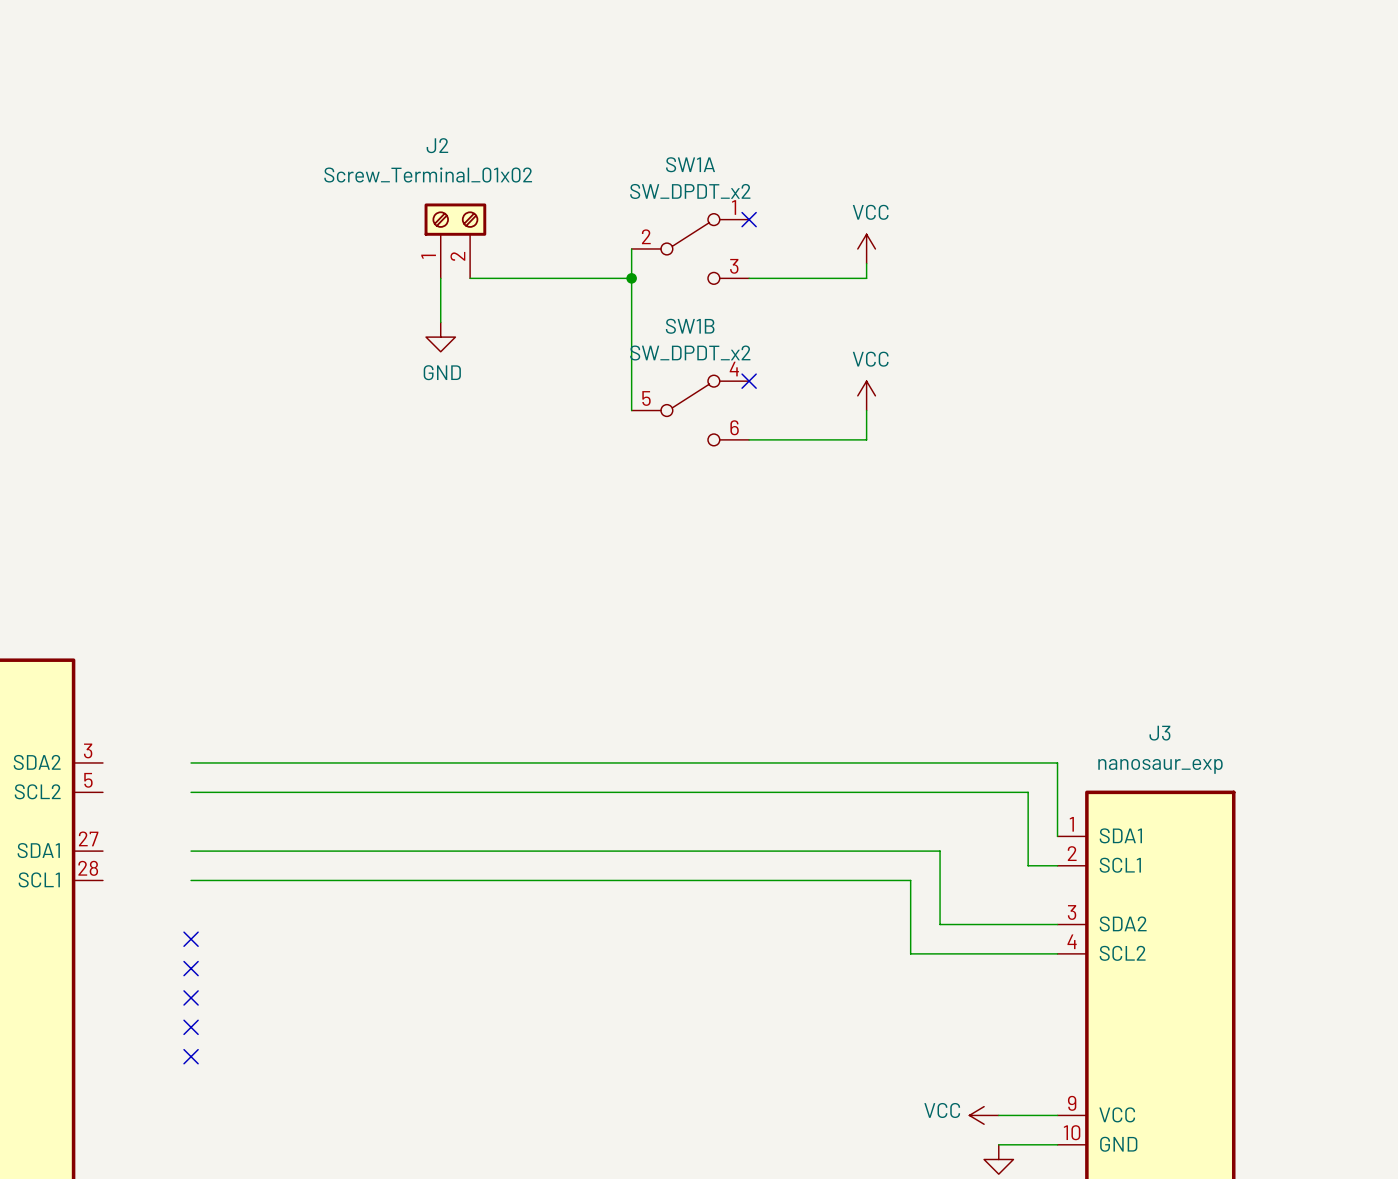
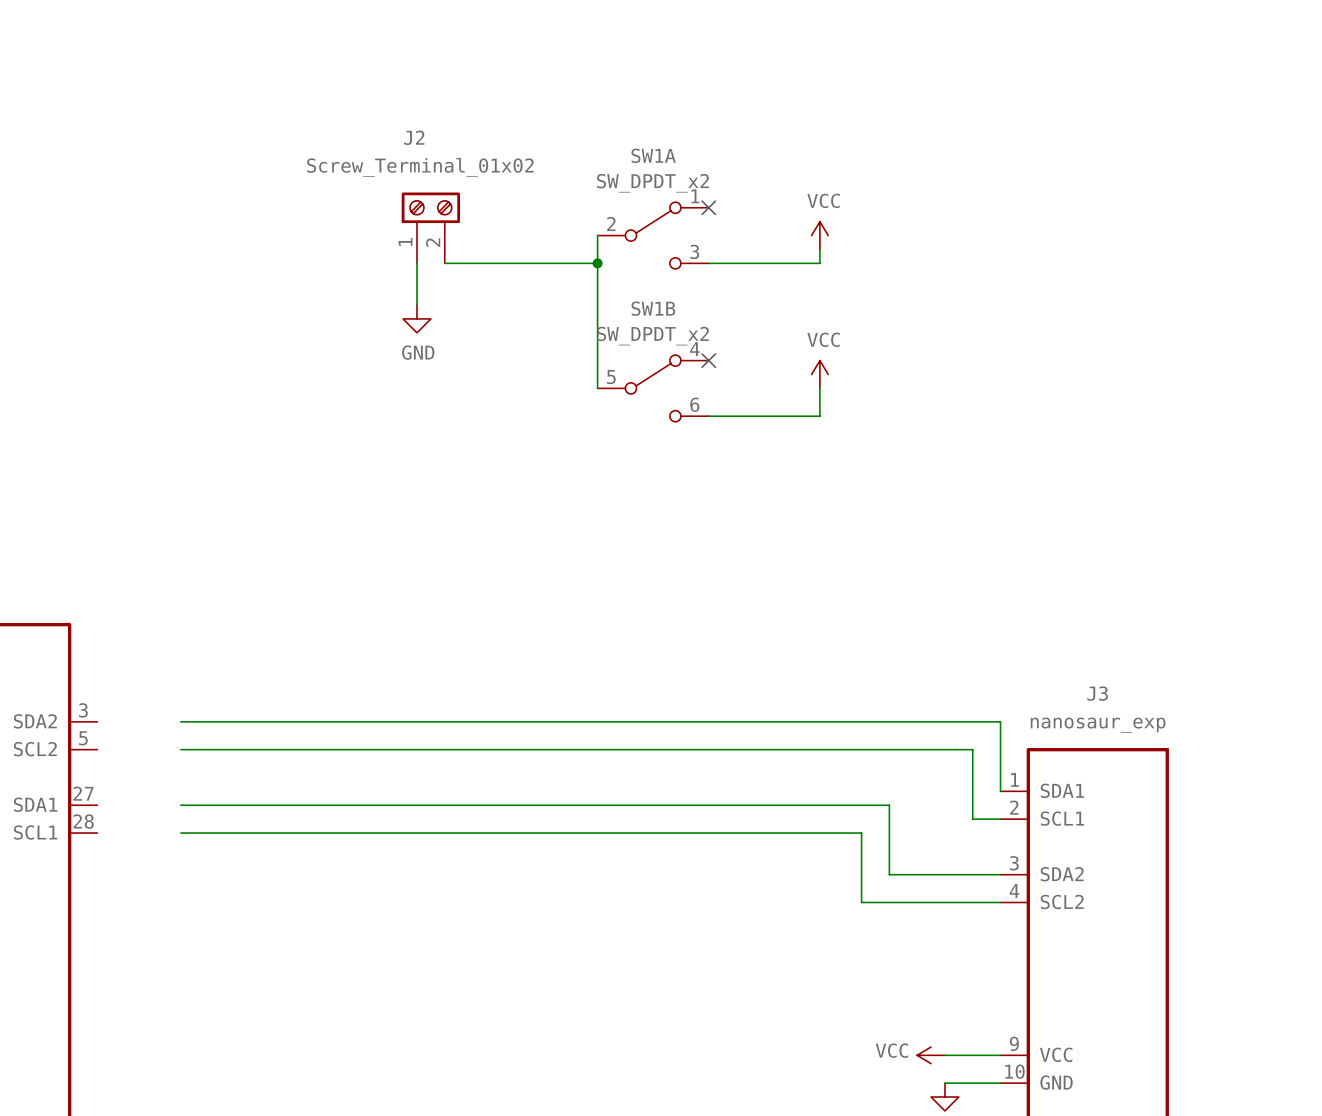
no-connect mark: (191, 939) -> none
no-connect mark: (191, 968) -> none
no-connect mark: (191, 997) -> none
no-connect mark: (191, 1027) -> none
no-connect mark: (191, 1056) -> none

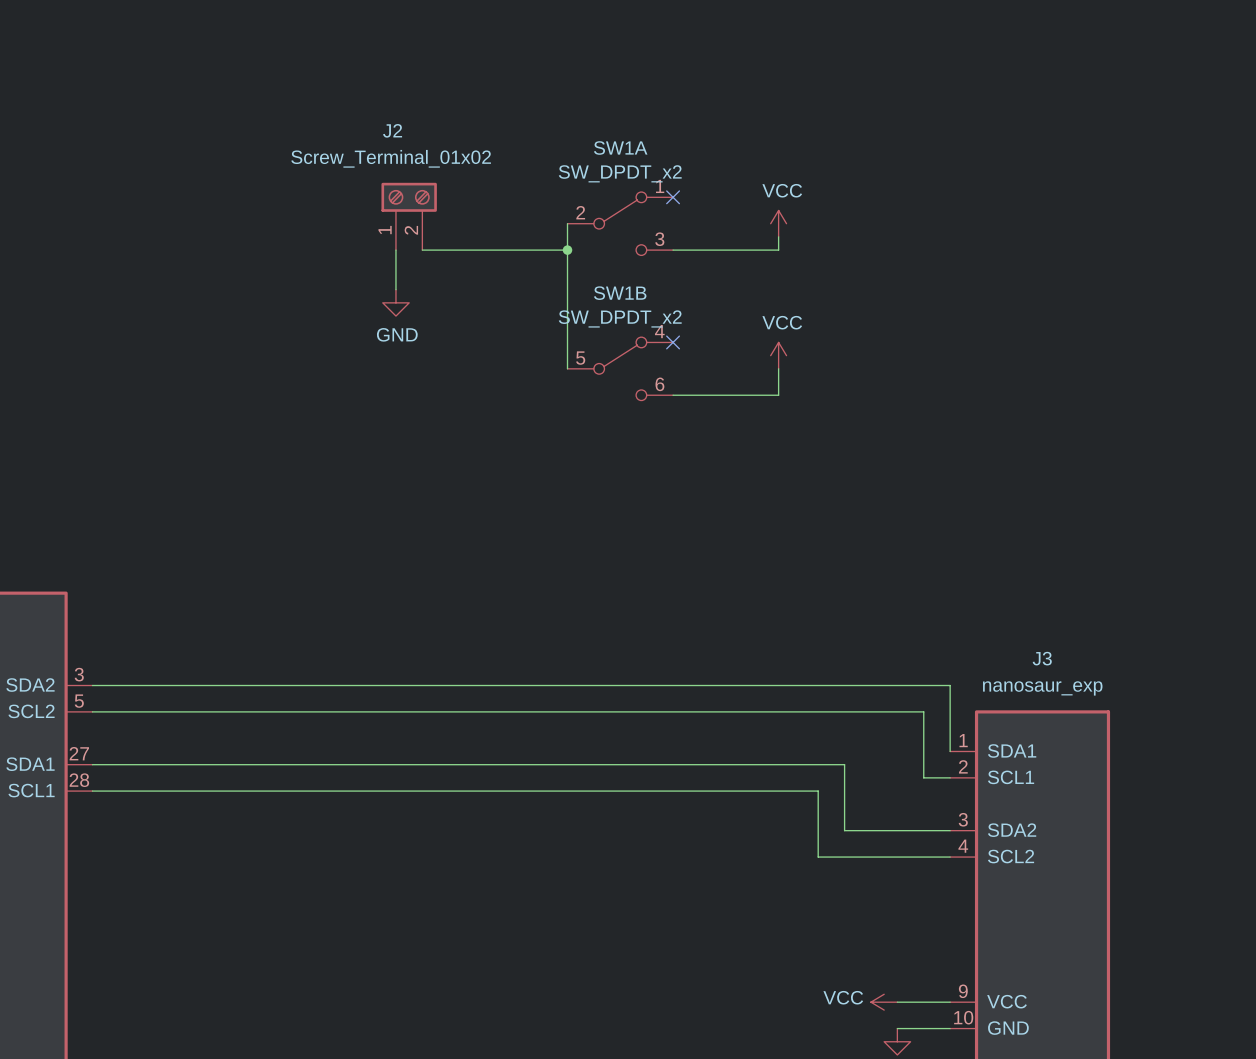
wire: none -> (92, 685) (171, 685)
wire: none -> (92, 711) (171, 711)
wire: none -> (92, 764) (171, 764)
wire: none -> (92, 791) (171, 791)

